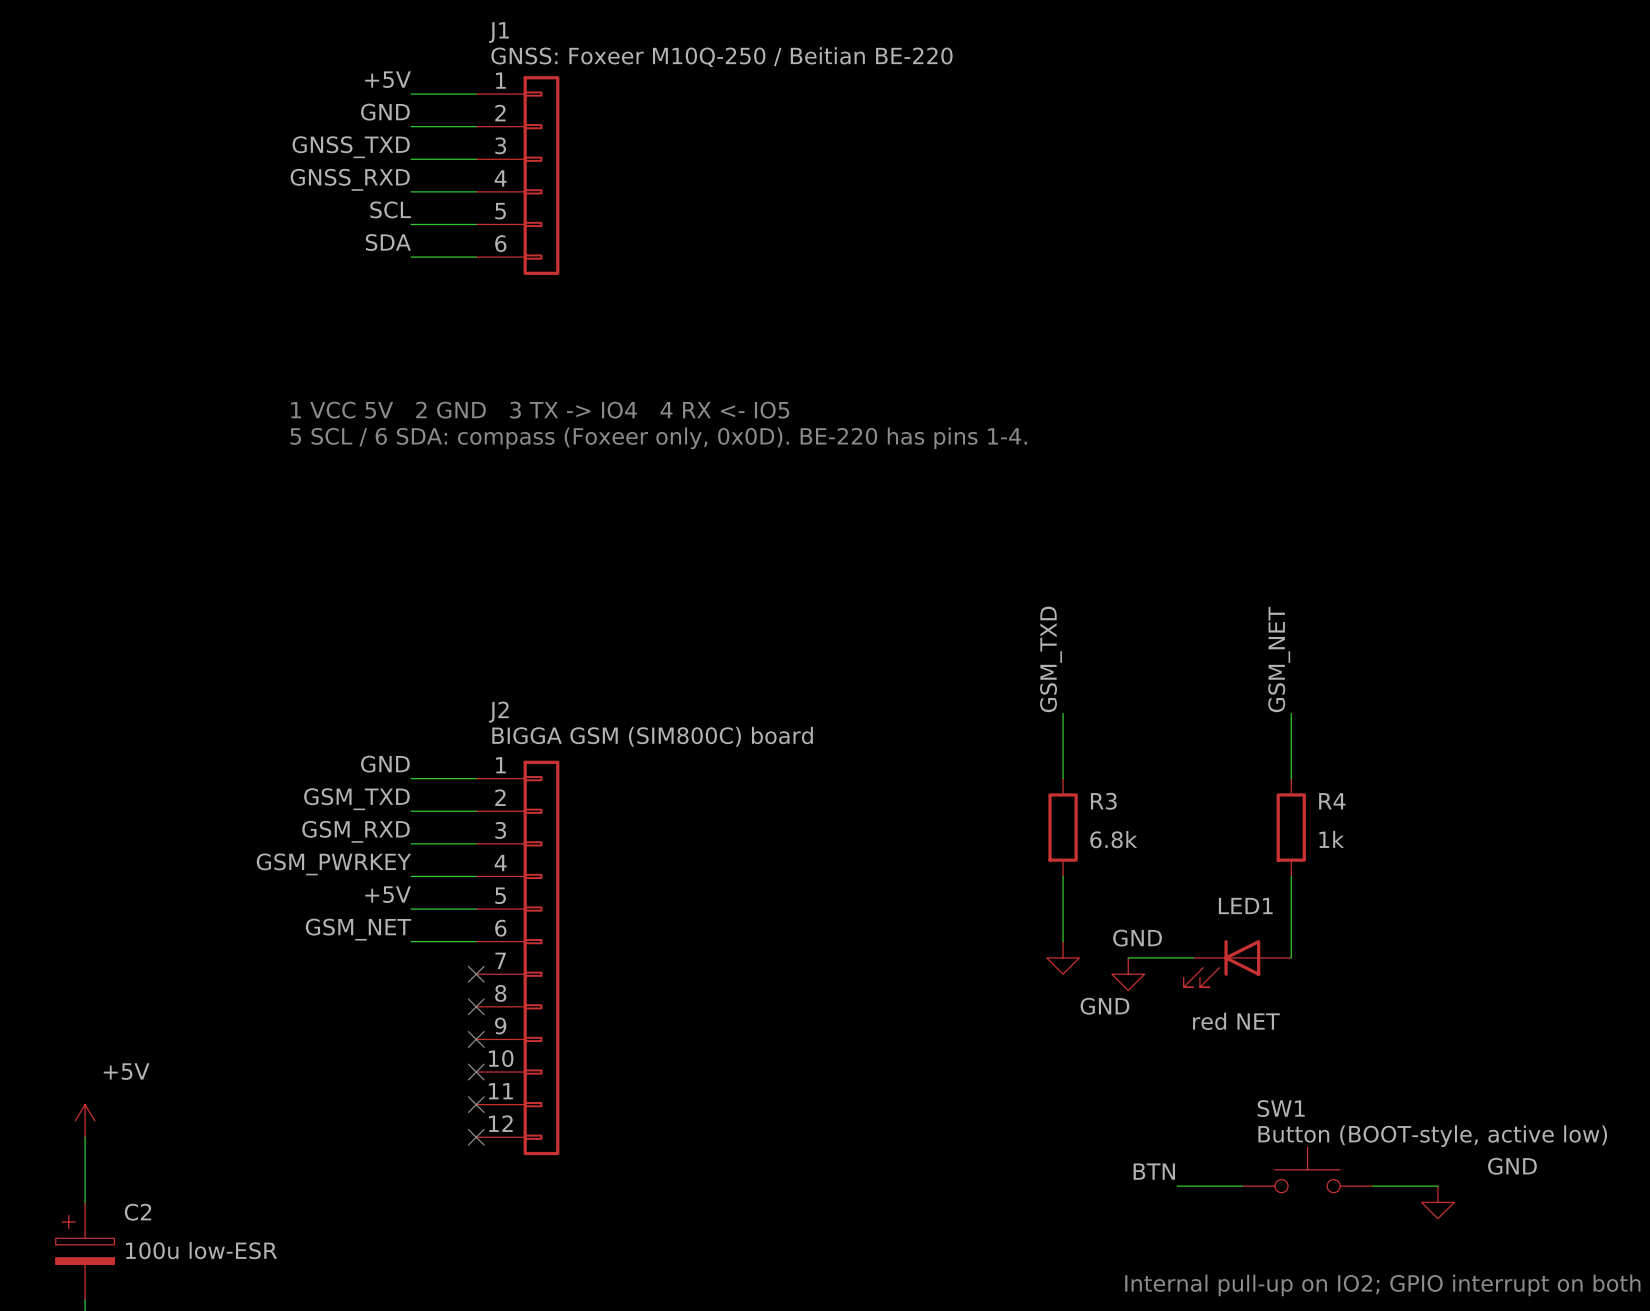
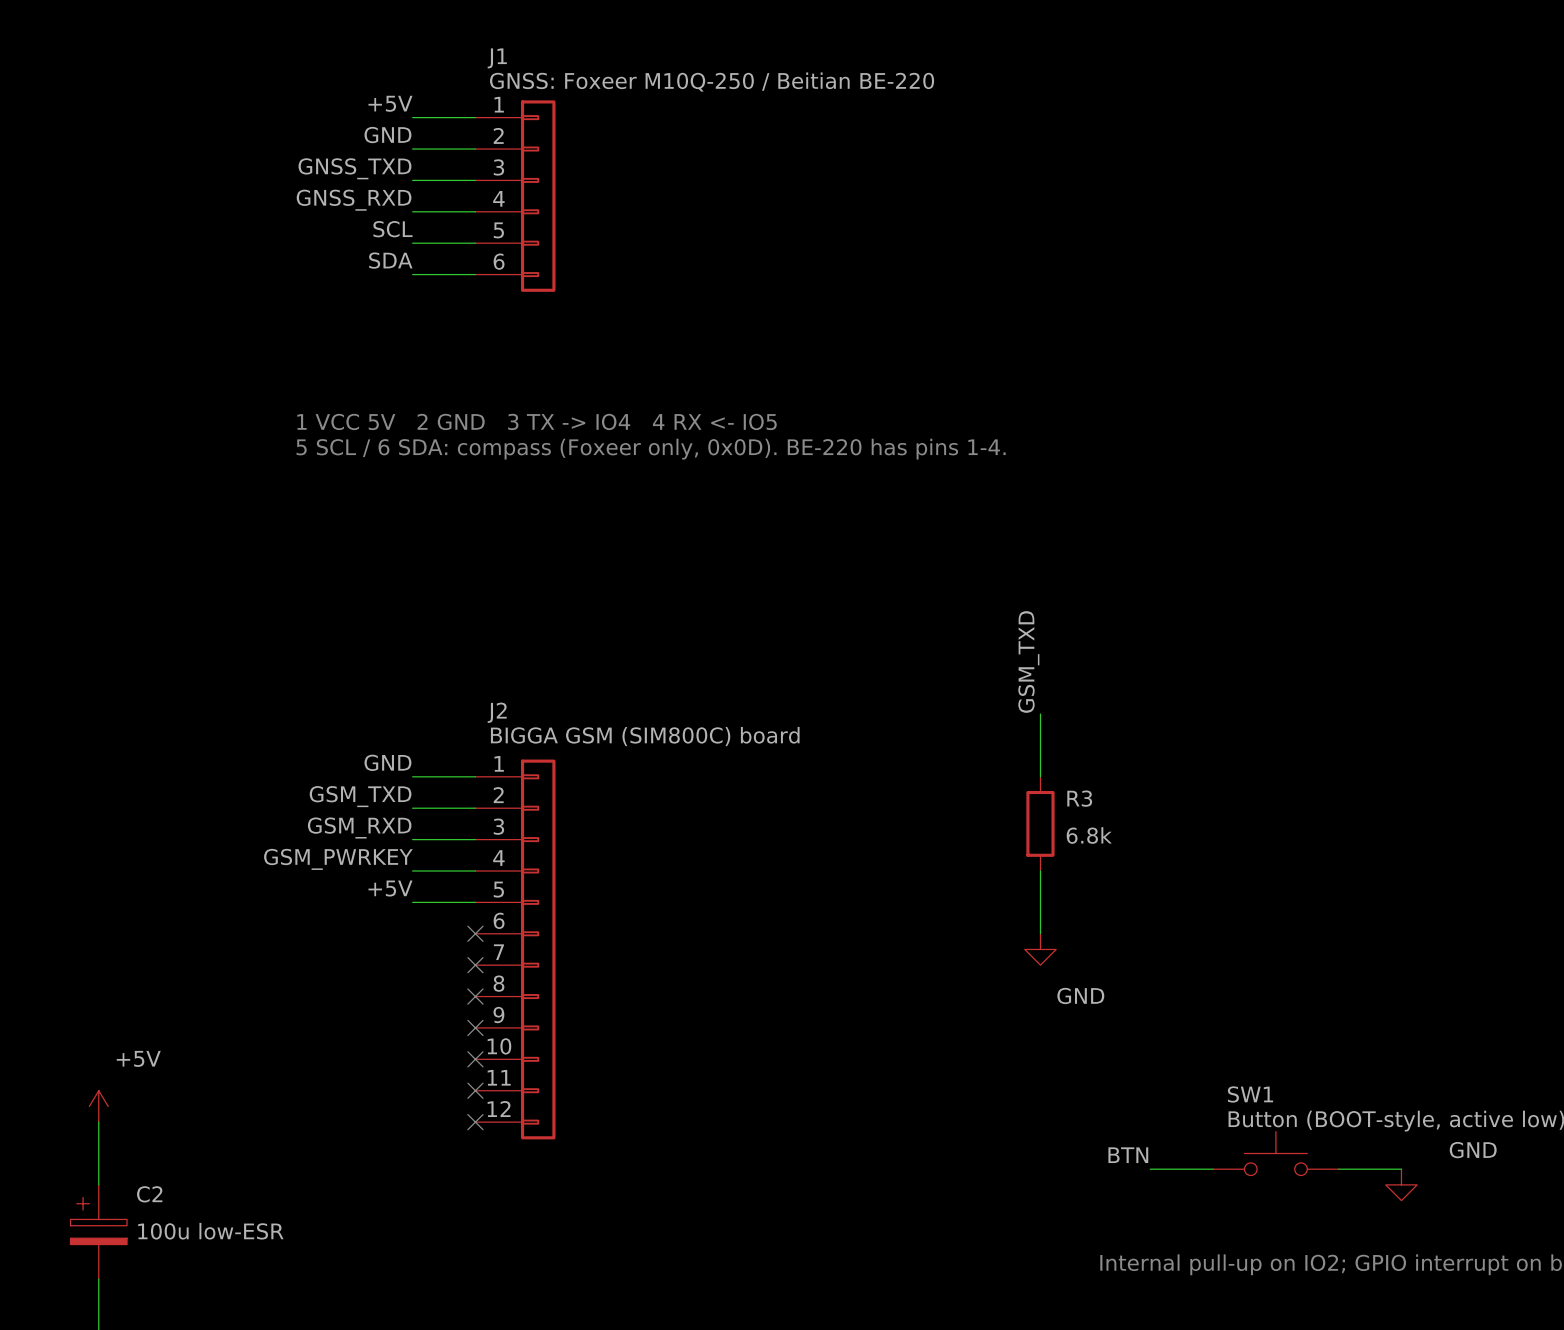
label: GSM_NET (1279, 659) -> none
wire: (1291, 713) (1291, 778) -> none
R4: 1k (1291, 827) -> none
wire: (1291, 876) (1291, 957) -> none
label: GSM_NET (358, 929) -> none
wire: (411, 941) (476, 941) -> none
no-connect mark: none -> (475, 933)
wire: (1128, 957) (1193, 957) -> none
LED1: red NET (1237, 963) -> none
power symbol: GND (1128, 974) -> none

